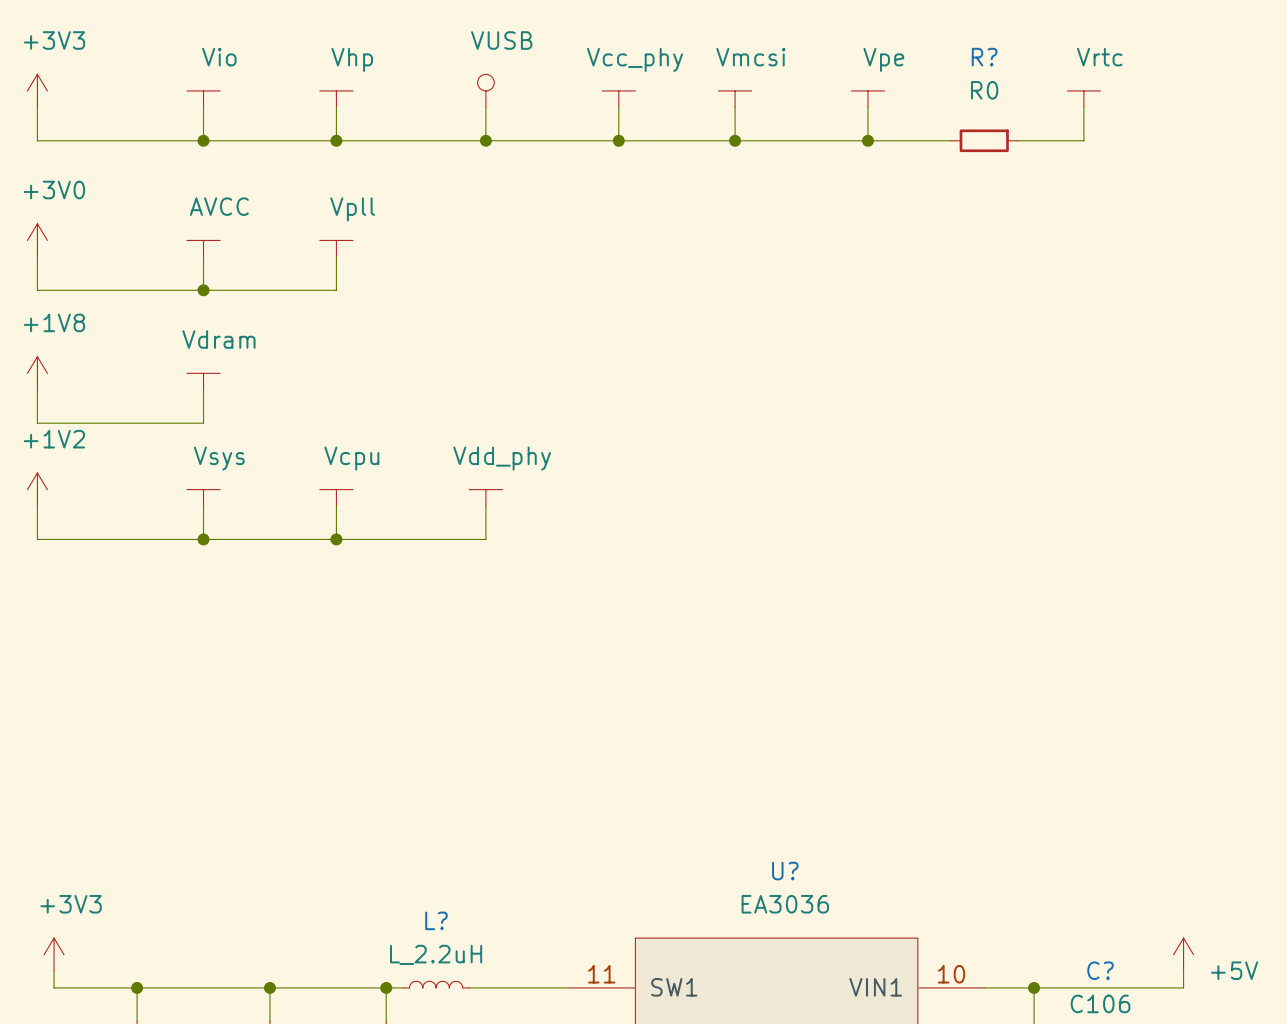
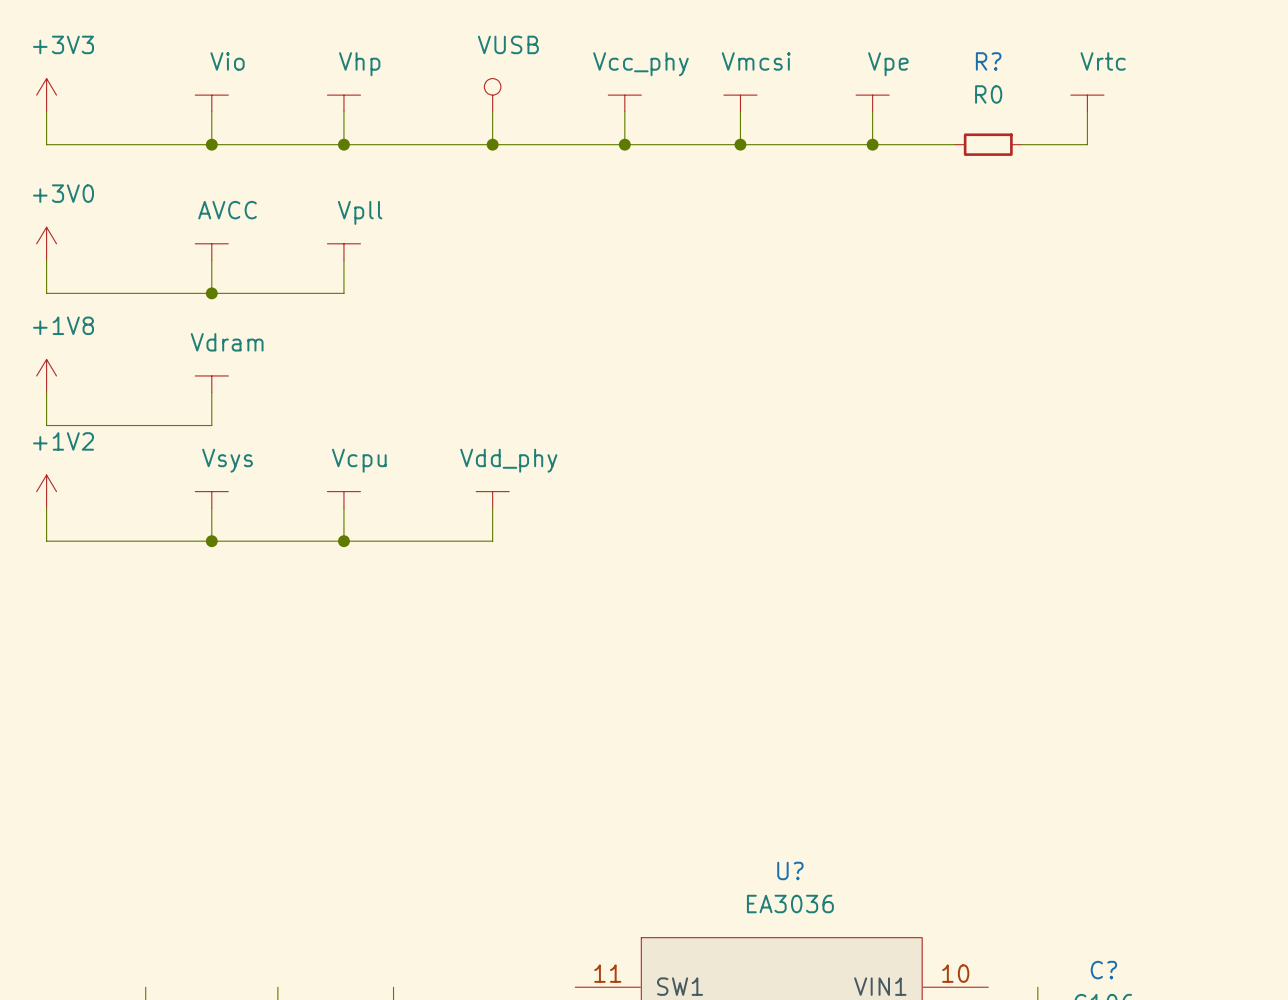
power symbol: +3V3 (54, 954) -> none
power symbol: +5V (1183, 954) -> none
wire: (54, 971) (54, 987) (402, 987) -> none
wire: (1183, 971) (1183, 987) (984, 987) -> none
L?: L_2.2uH (436, 984) -> none
junction: (137, 987) -> none
junction: (269, 987) -> none
junction: (386, 987) -> none
wire: (469, 987) (568, 987) -> none
junction: (1034, 987) -> none

